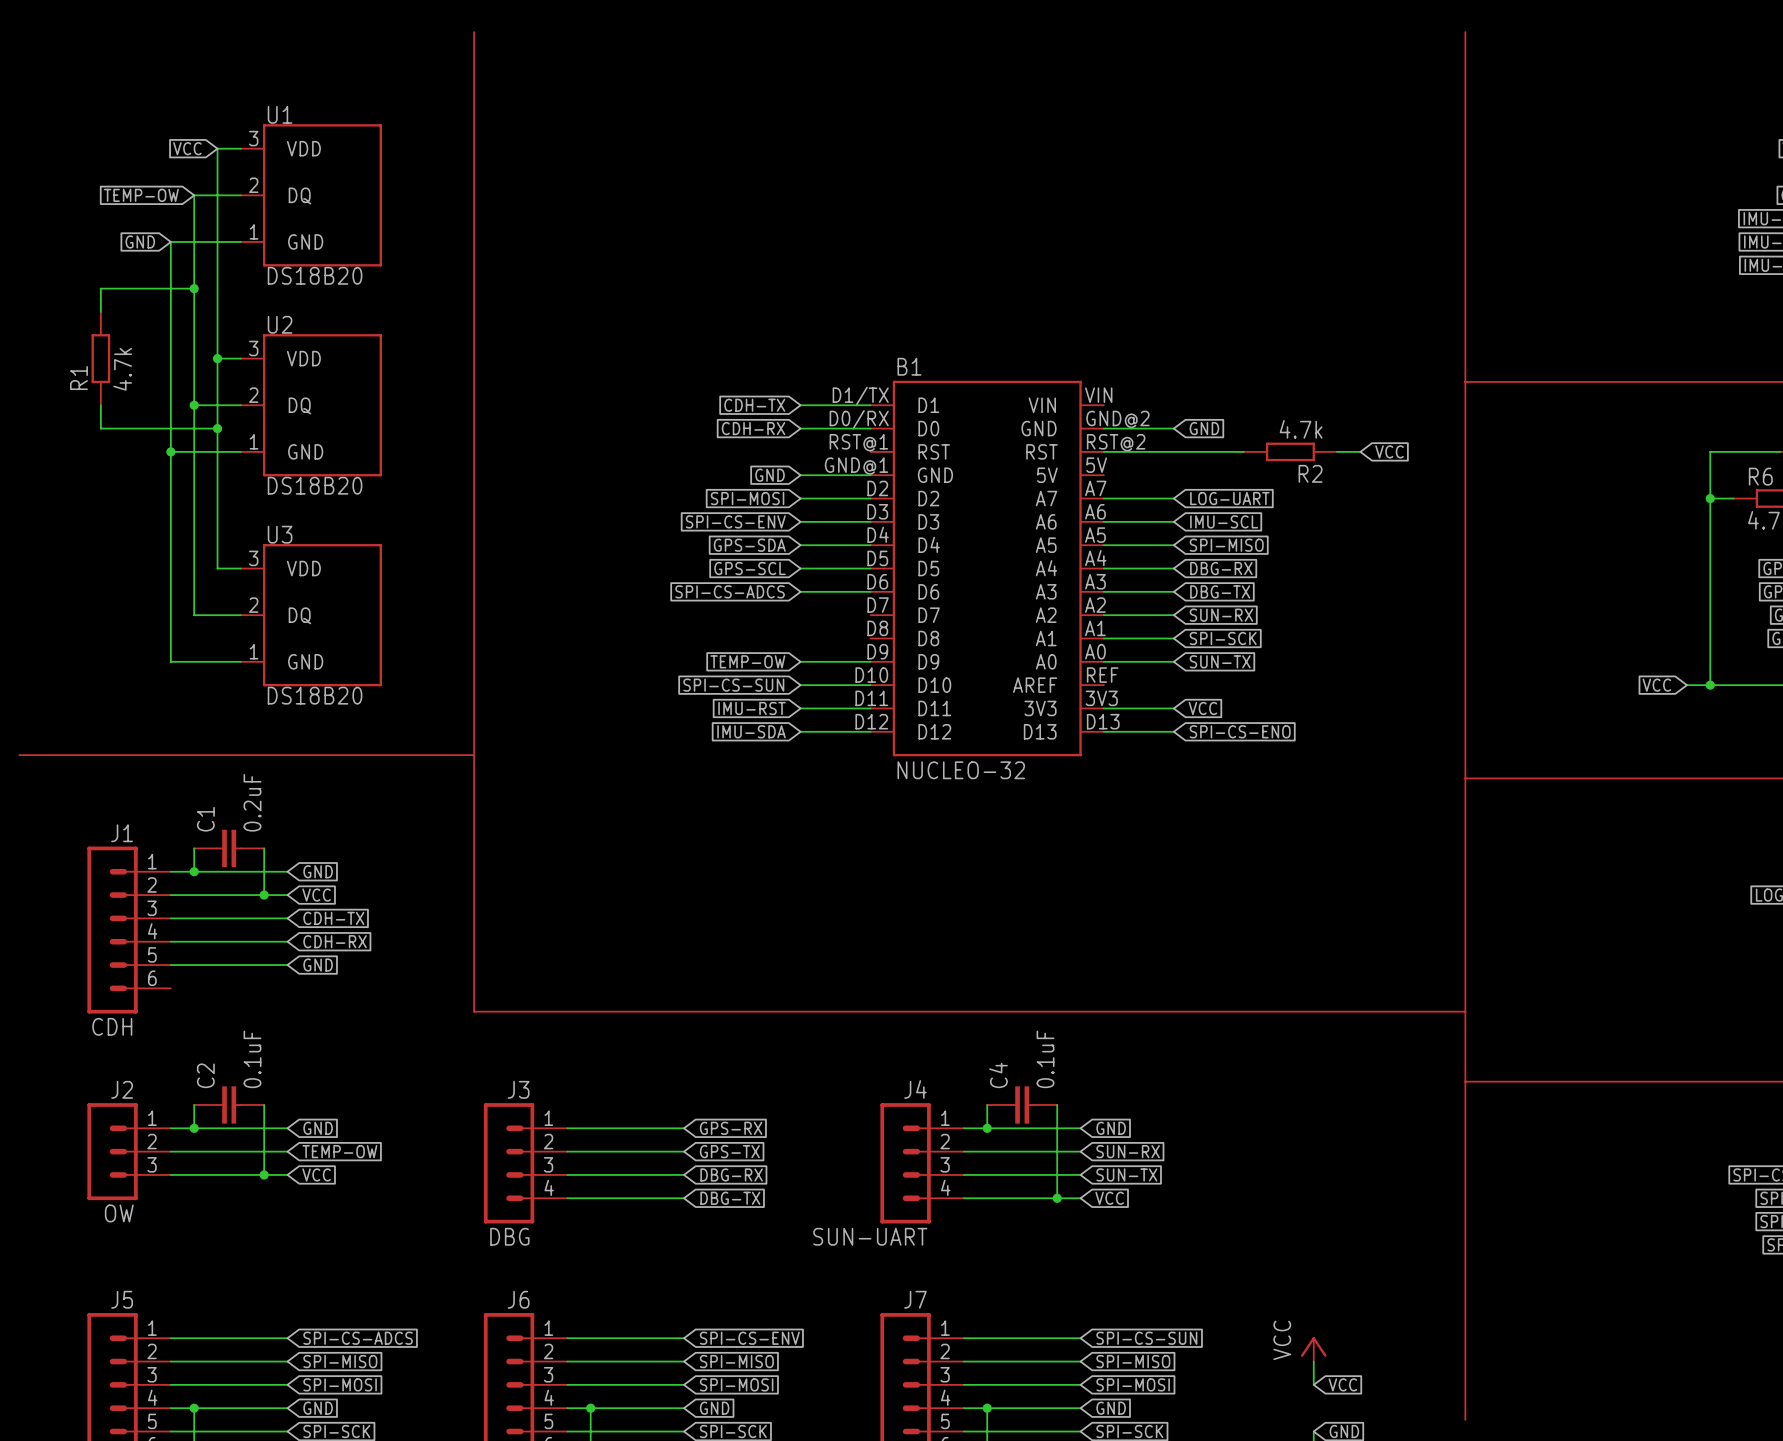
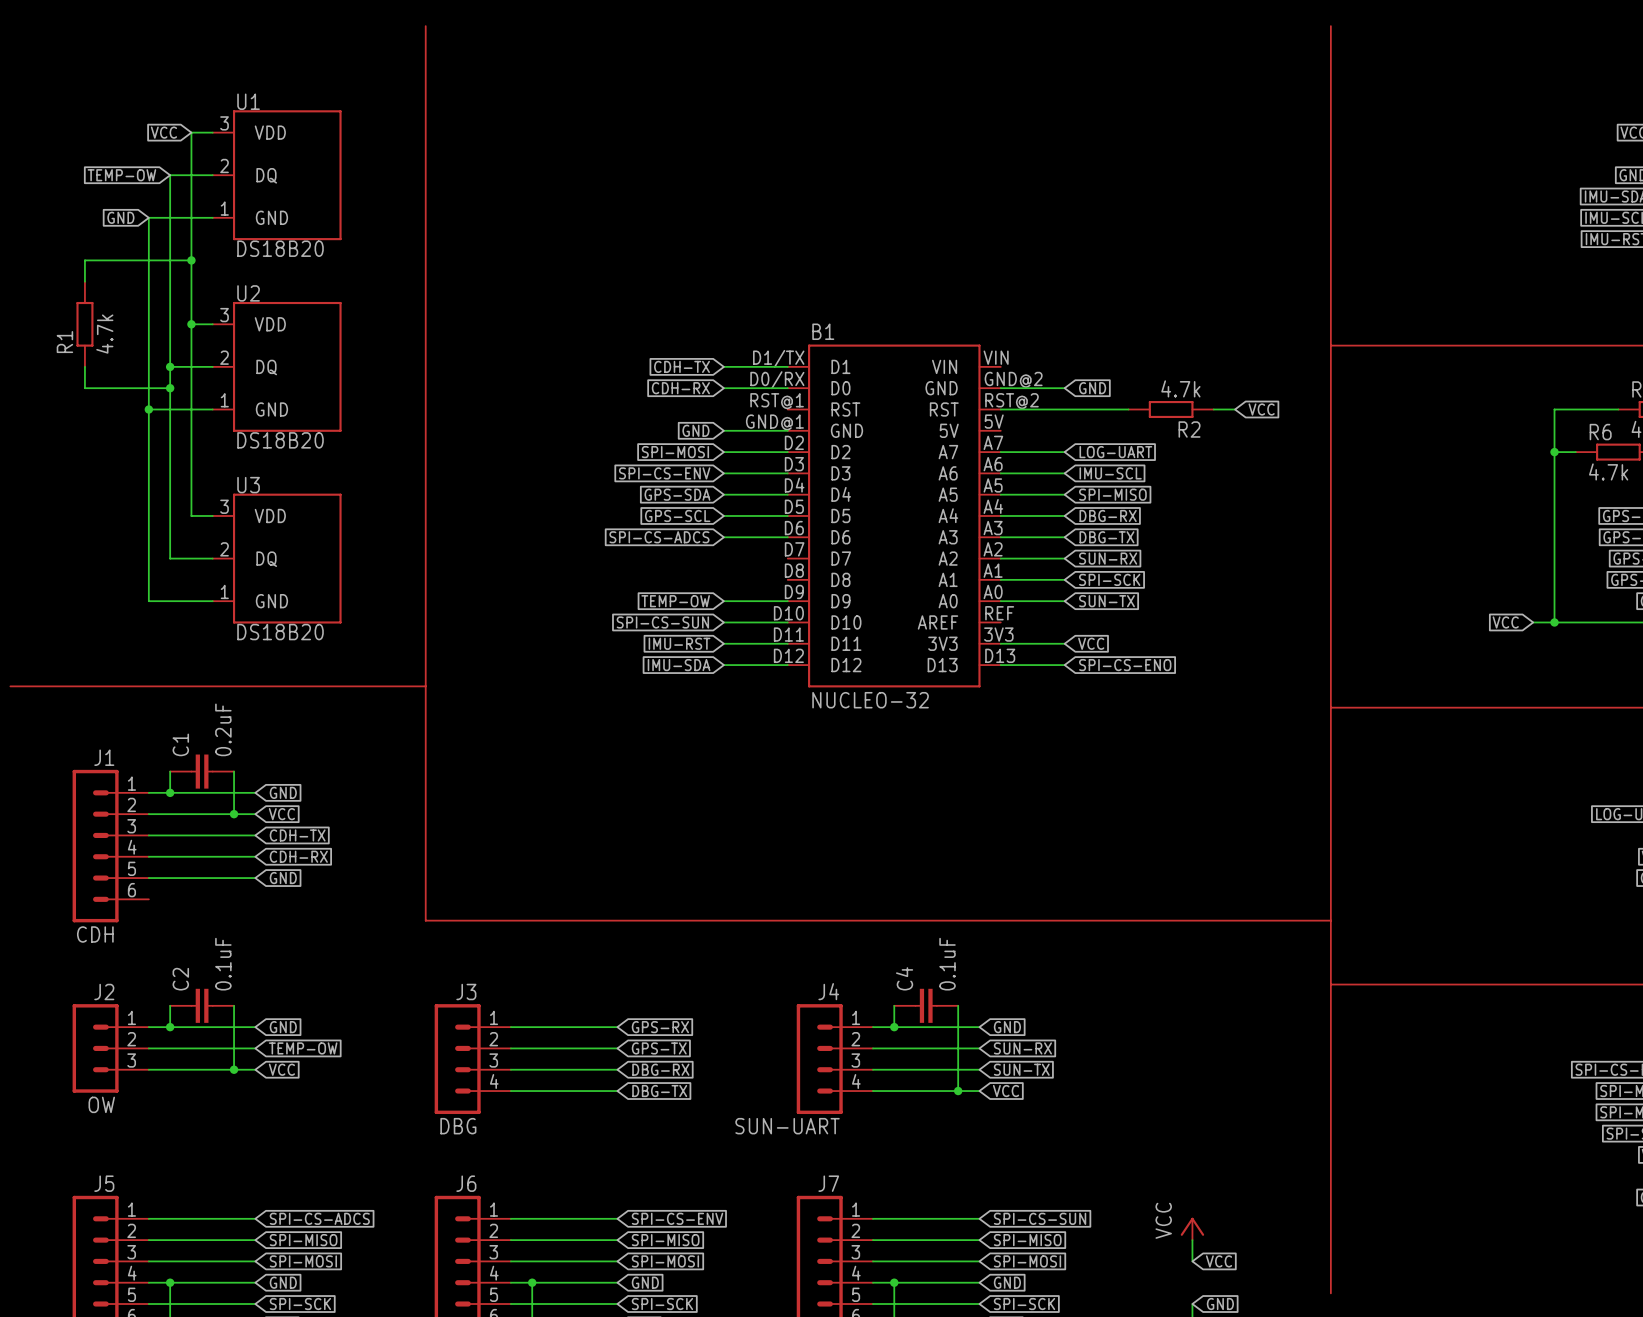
junction position: (194, 288) -> (191, 260)
wire: (194, 428) (217, 428) -> (170, 260) (191, 260)
junction position: (217, 428) -> (170, 388)

